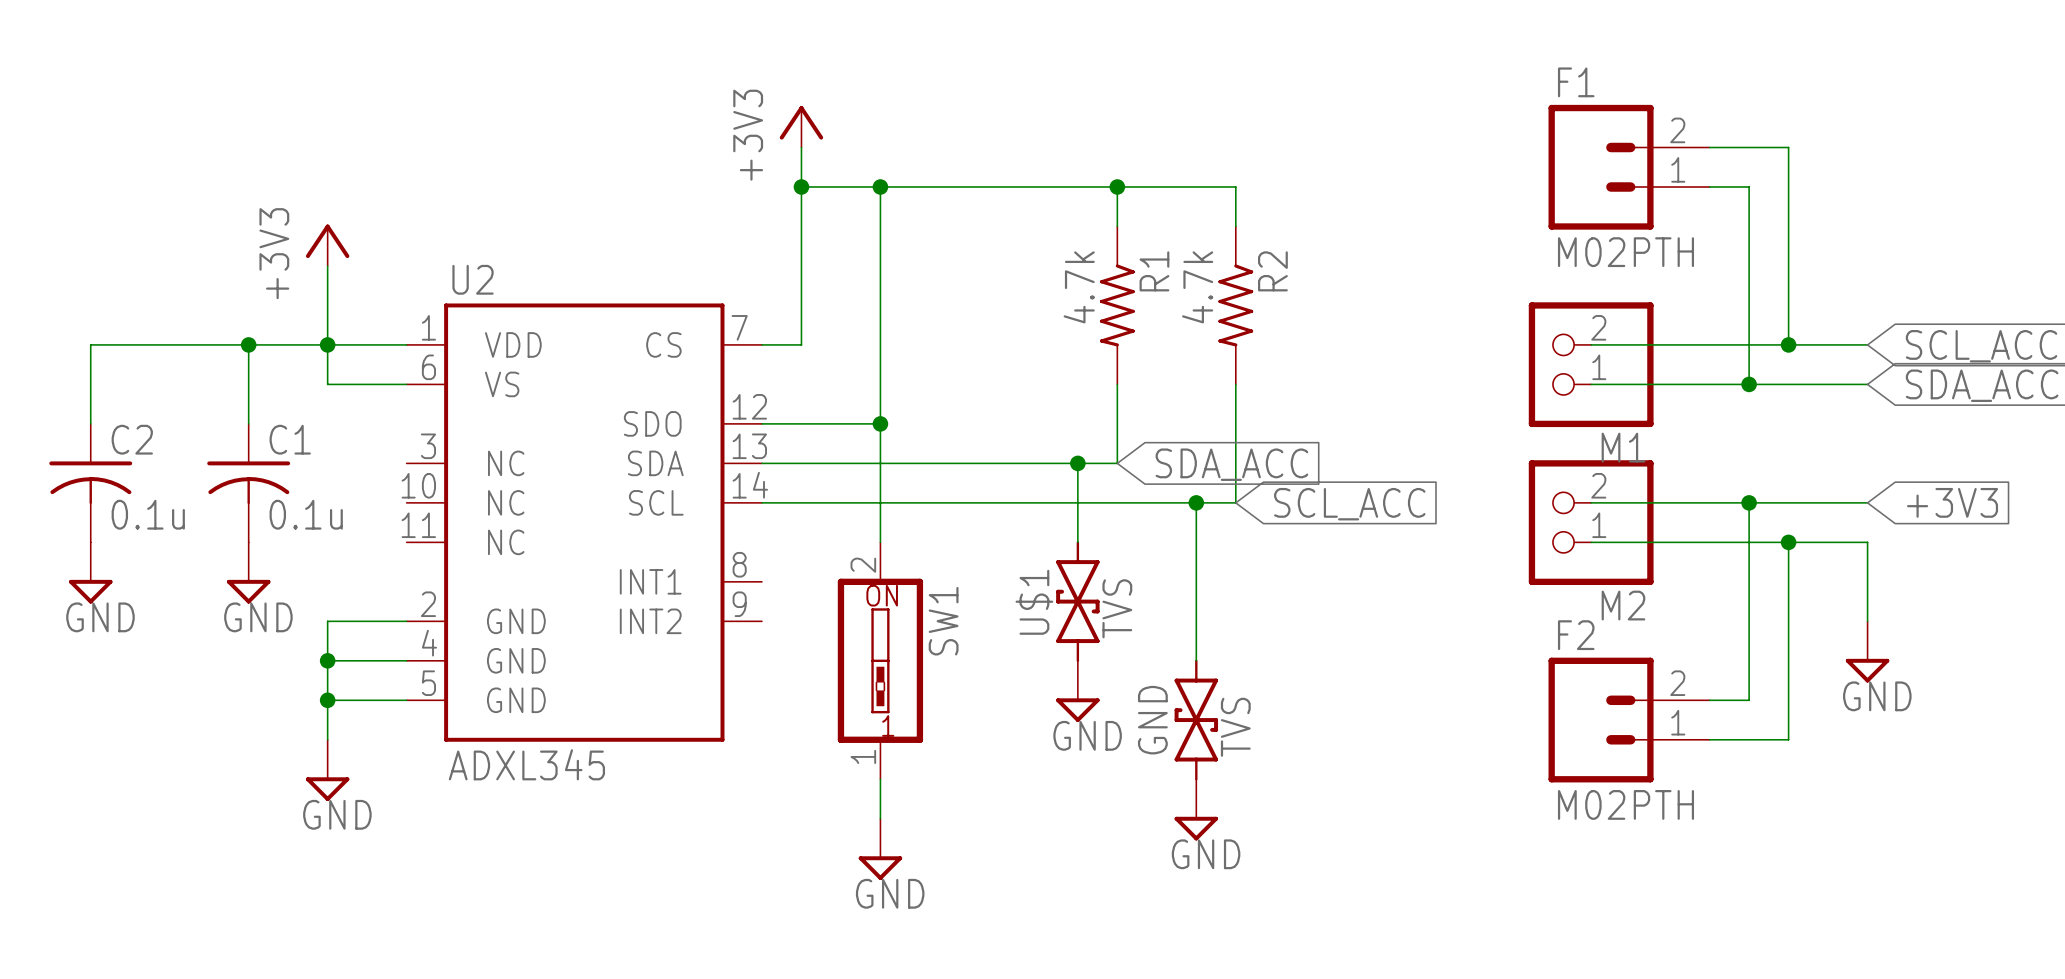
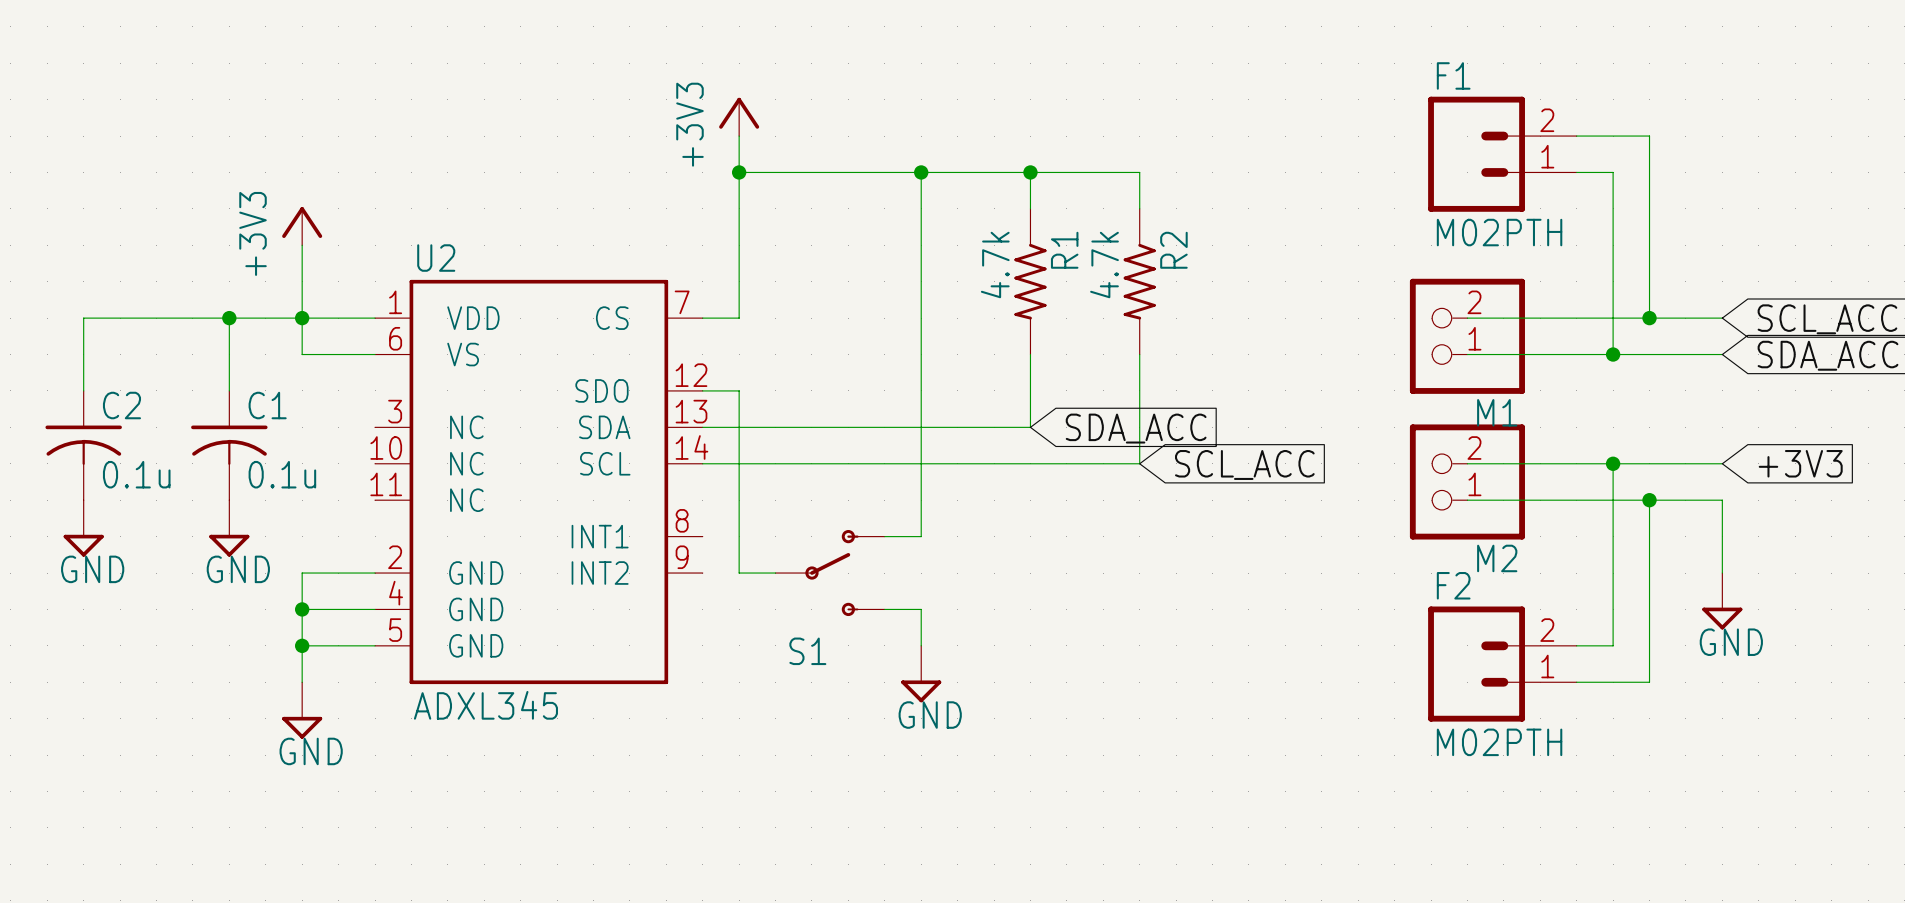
wire: (880, 186) (880, 542) -> none
junction: (880, 186) -> none
wire: none -> (921, 172) (921, 536) (884, 536)
junction: none -> (921, 172)
wire: (801, 423) (880, 423) -> (739, 390) (739, 573) (775, 573)
junction: (880, 423) -> none
wire: (1077, 463) (1077, 542) -> none
junction: (1077, 463) -> none
wire: (1196, 502) (1196, 660) -> none
junction: (1196, 502) -> none
U$1: TVS (1077, 601) -> none
S1: none -> (830, 573)
SW1: (880, 660) -> none
wire: none -> (884, 609) (921, 609) (921, 645)
power symbol: GND (1077, 691) -> none
GND: TVS (1196, 720) -> none
power symbol: none -> GND (921, 674)
wire: (880, 779) (880, 818) -> none
power symbol: GND (1196, 809) -> none
power symbol: GND (880, 849) -> none

